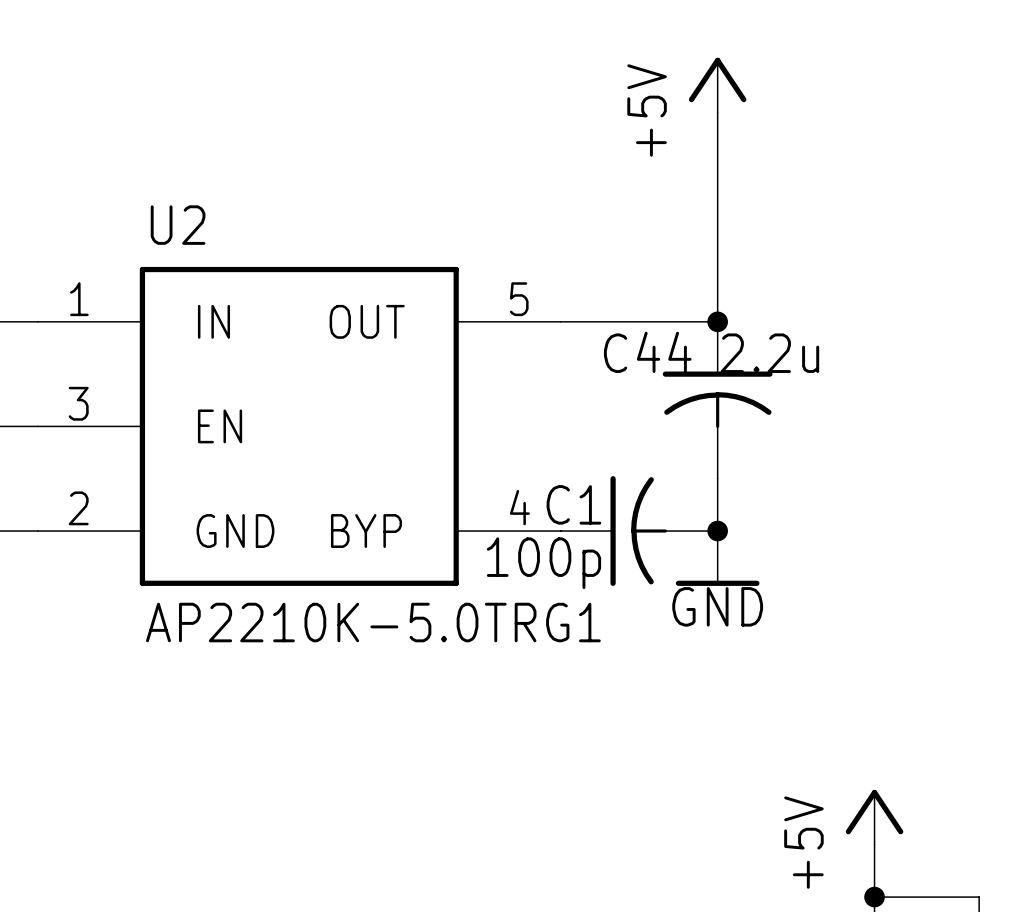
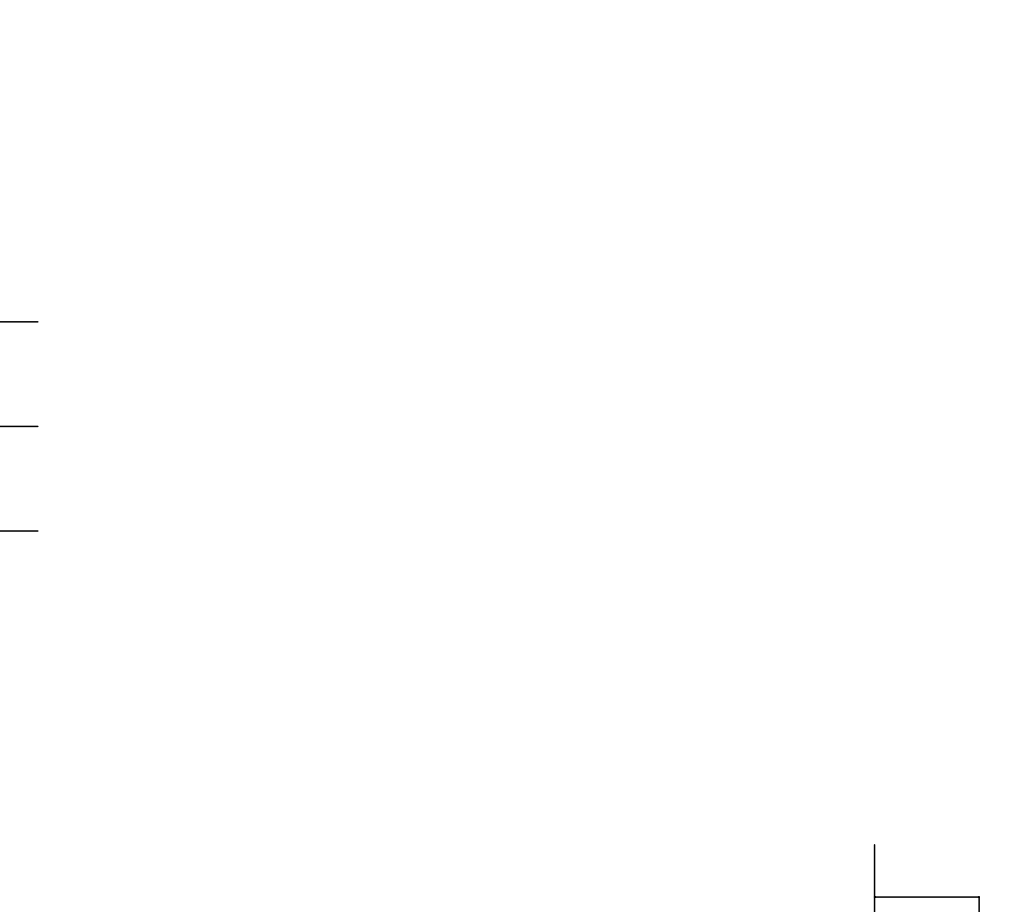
power symbol: +5V (717, 85) -> none
wire: (717, 112) (717, 321) (560, 321) -> none
junction: (717, 321) -> none
C44: 2.2u (717, 400) -> none
U2: AP2210K-5.0TRG1 (299, 426) -> none
wire: (717, 478) (717, 531) -> none
C1: 100p (639, 531) -> none
junction: (717, 531) -> none
power symbol: GND (717, 558) -> none
power symbol: +5V (874, 817) -> none
junction: (874, 897) -> none

